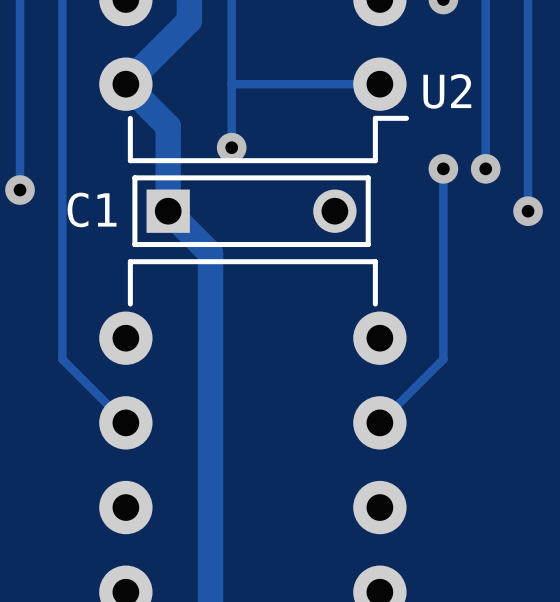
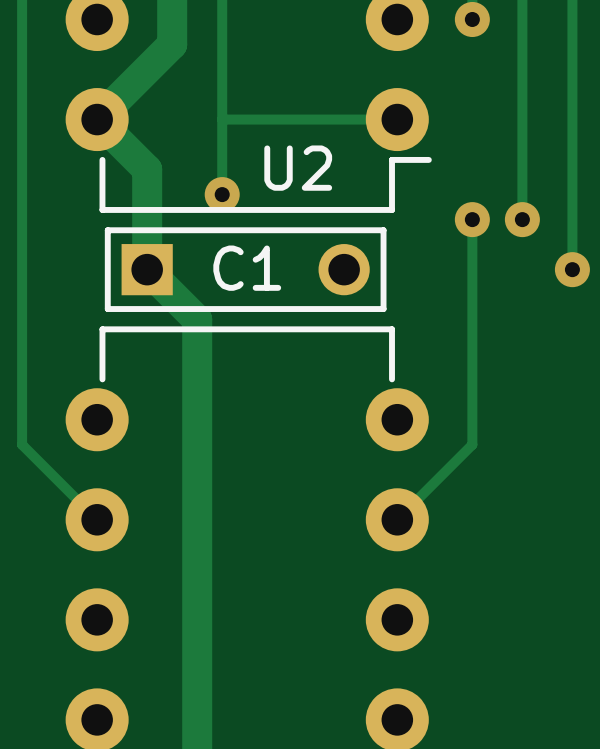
U2 name position: U2 (447, 91) -> U2 (298, 168)
C1 name position: C1 (92, 209) -> C1 (247, 268)

